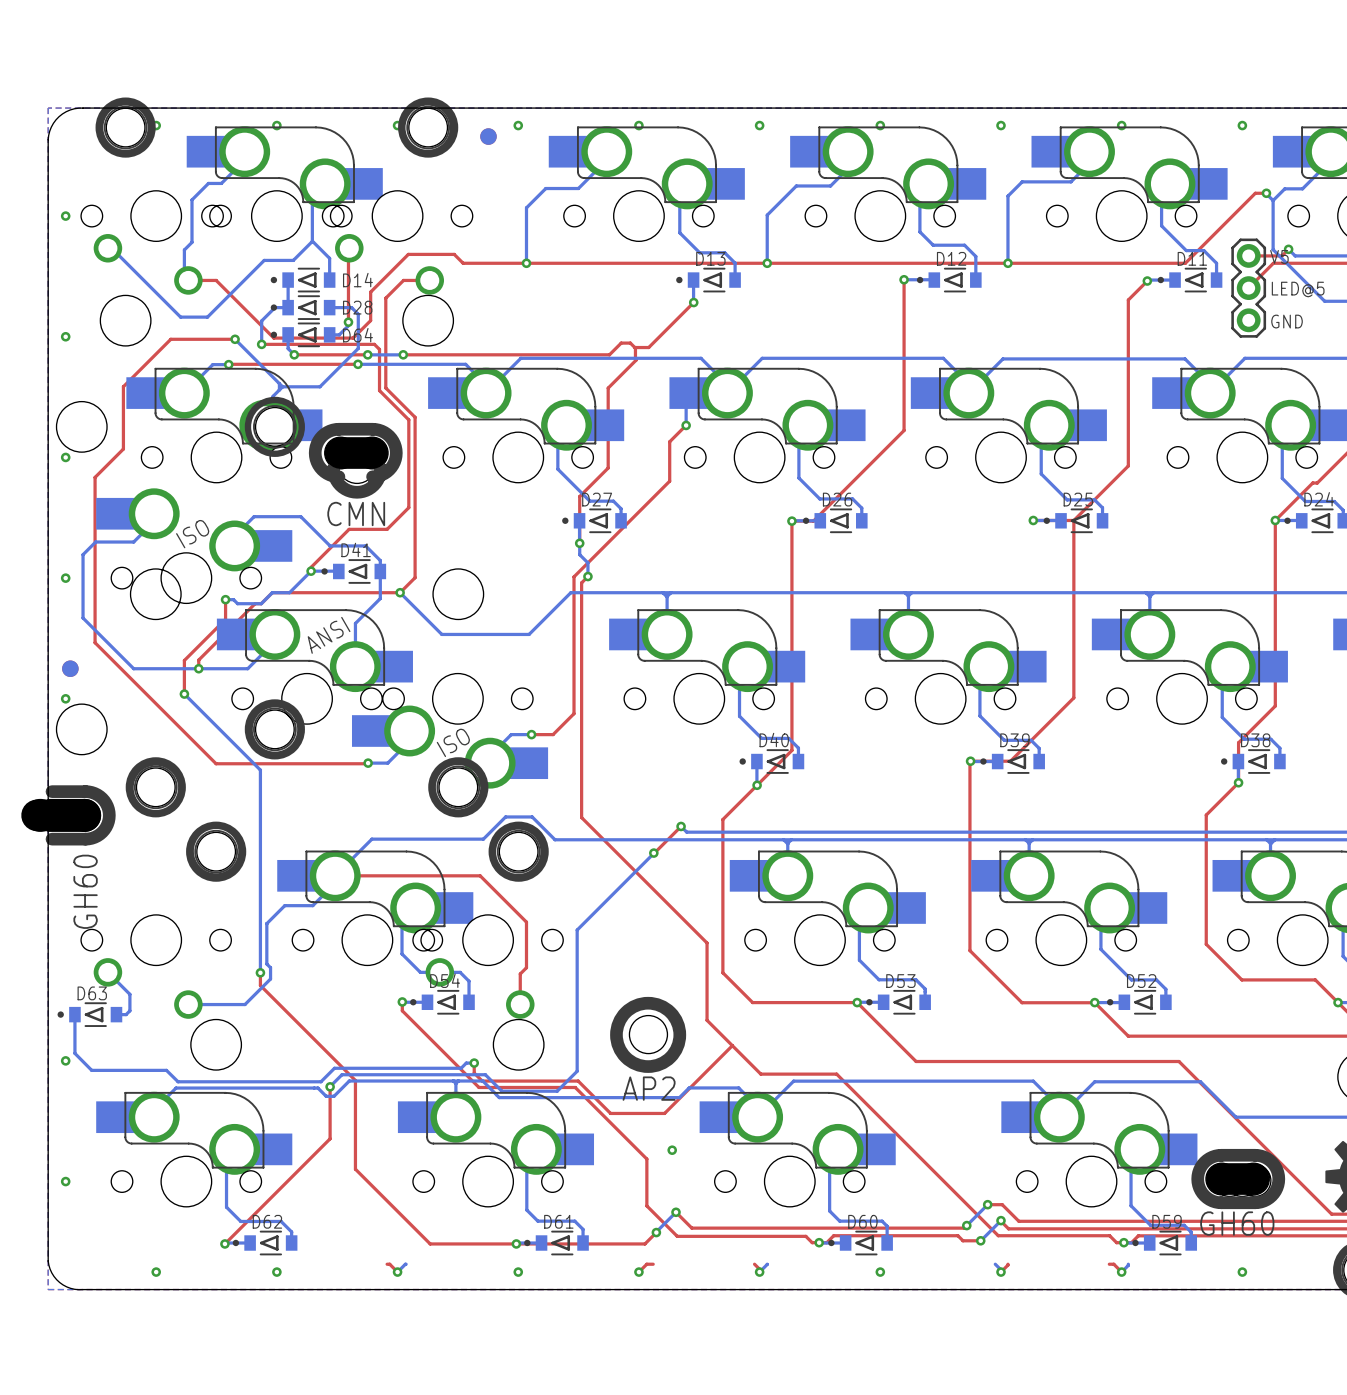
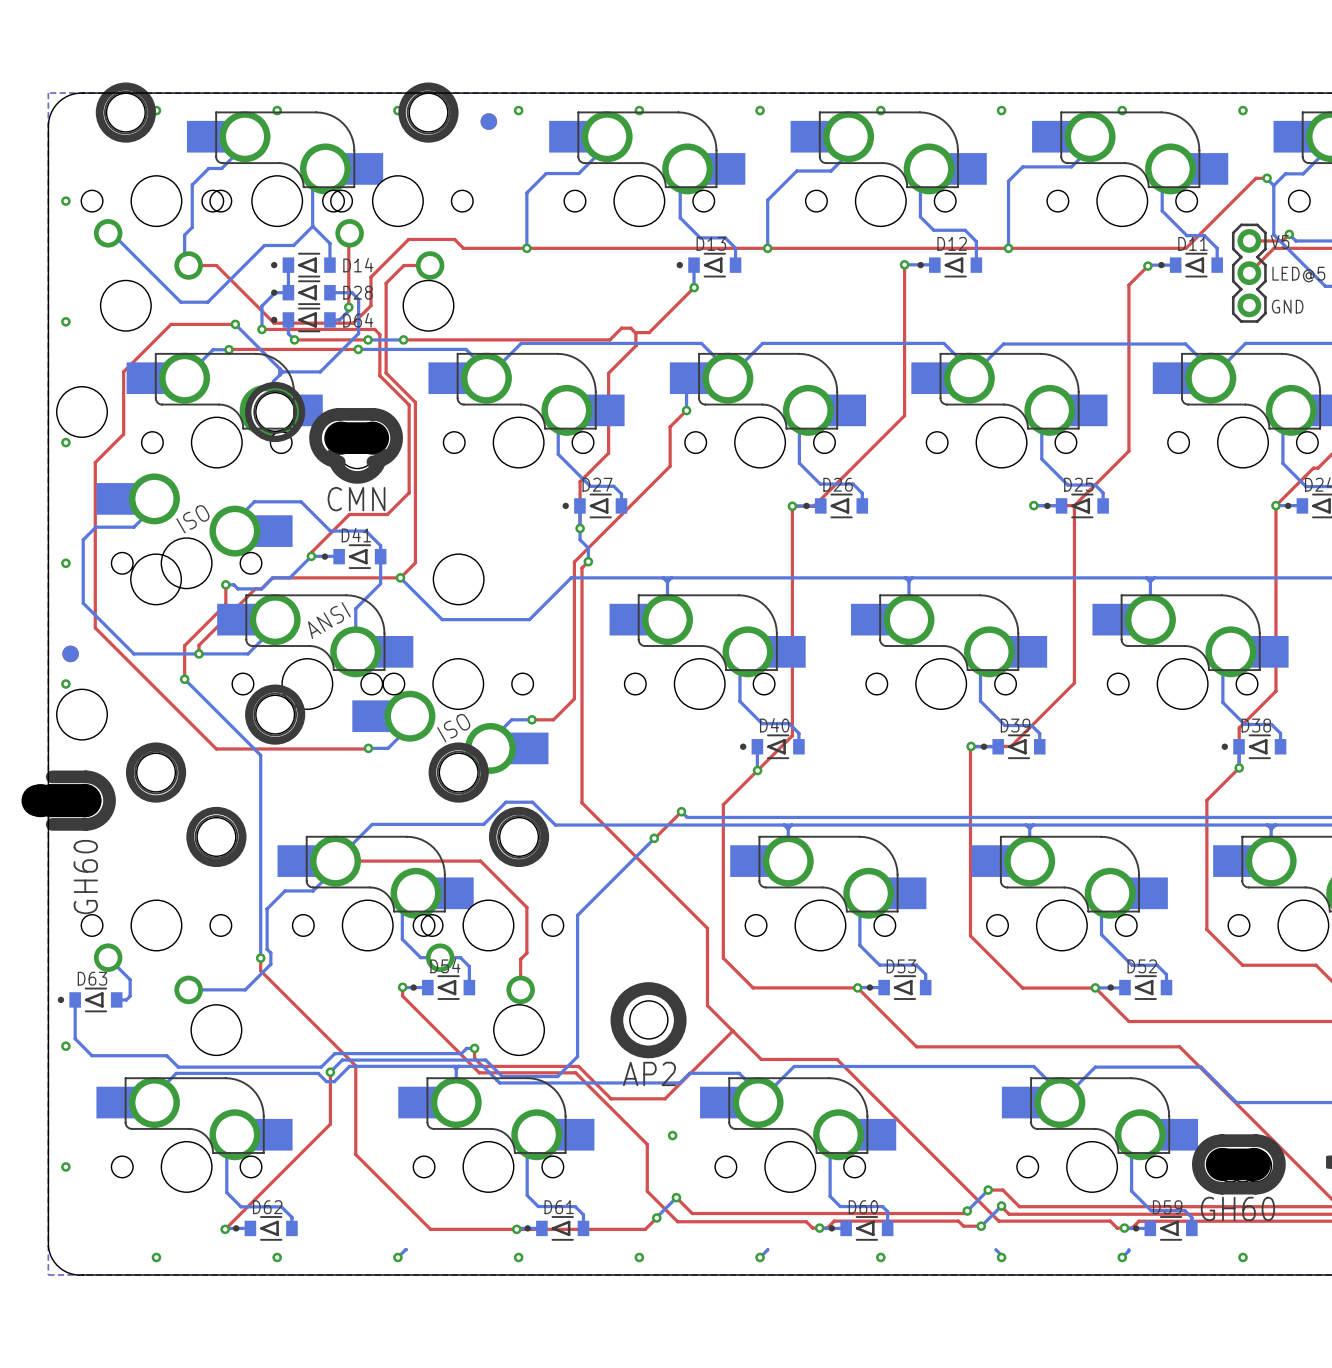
top track: (387, 1264) (389, 1264) (397, 1272) -> none
top track: (653, 1264) (646, 1264) (638, 1272) -> none
top track: (754, 1264) (759, 1269) (759, 1272) -> none
top track: (1007, 1264) (1001, 1272) -> none
top track: (1109, 1264) (1113, 1264) (1121, 1272) -> none

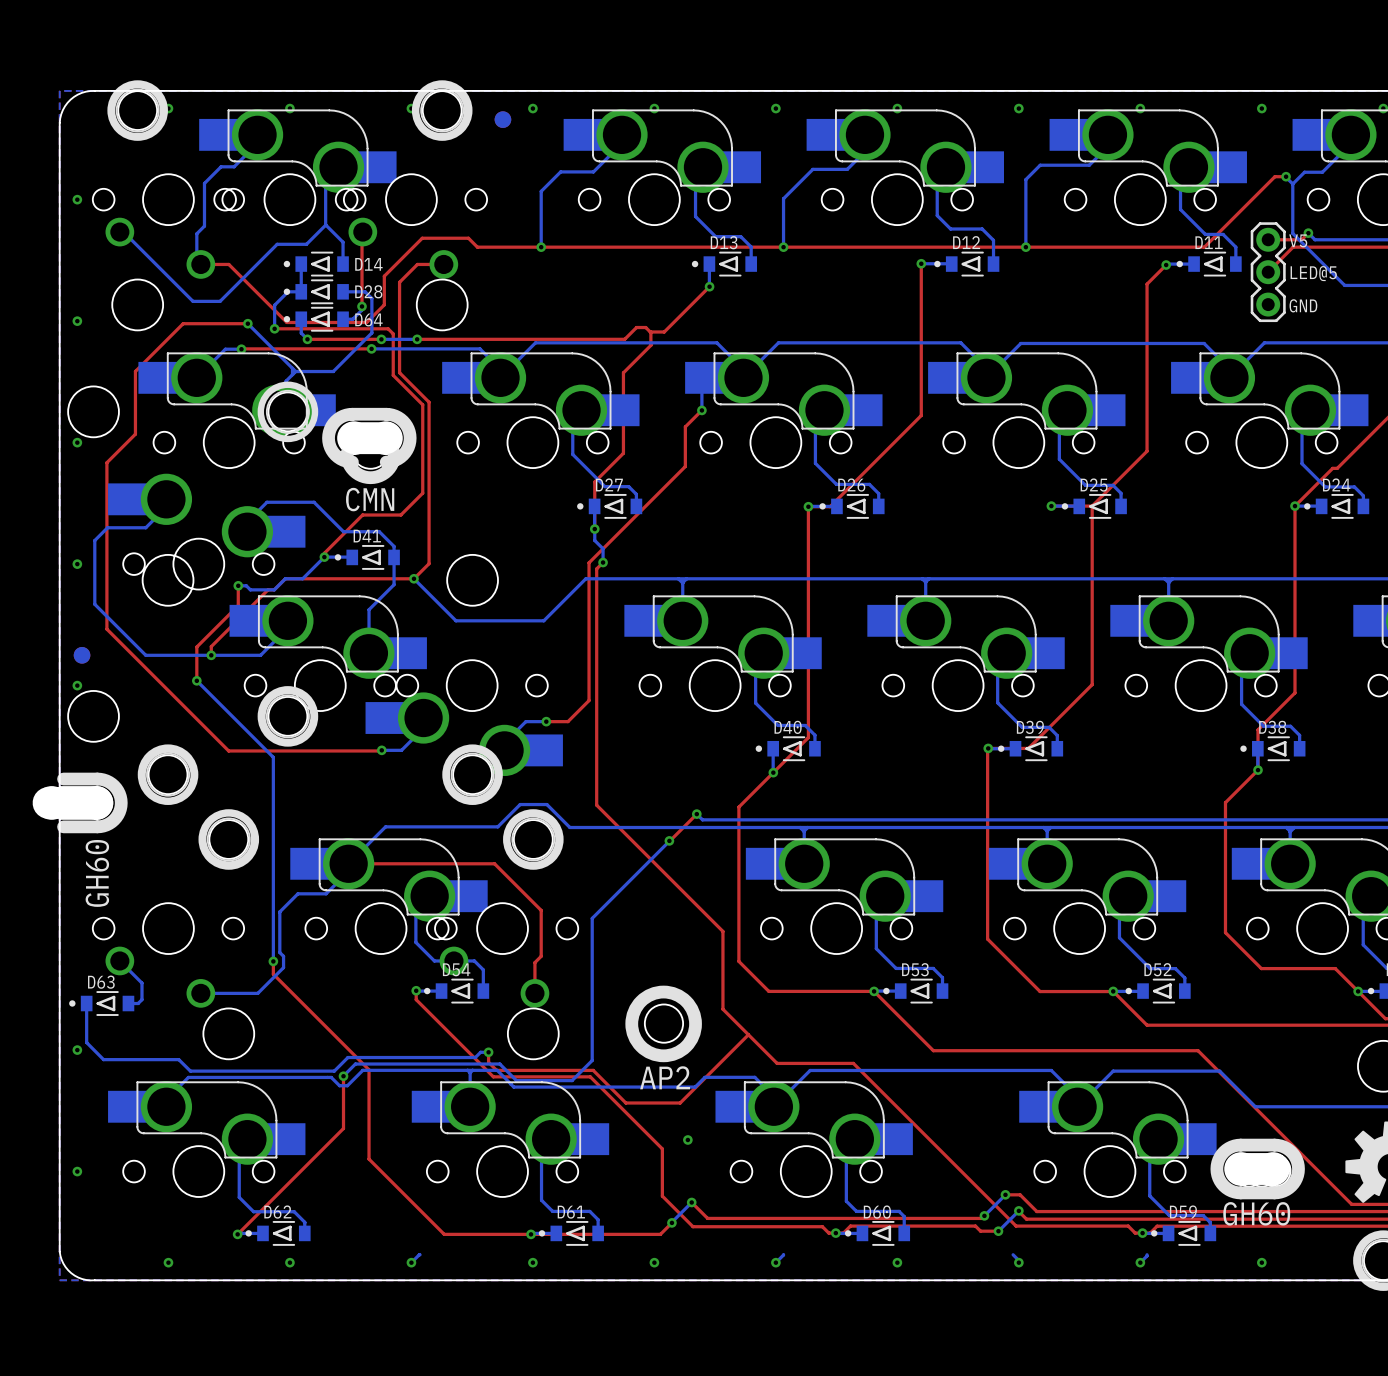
text: ISO (192, 519) -> none
text: ANSI (329, 620) -> none
text: ISO (453, 728) -> none

